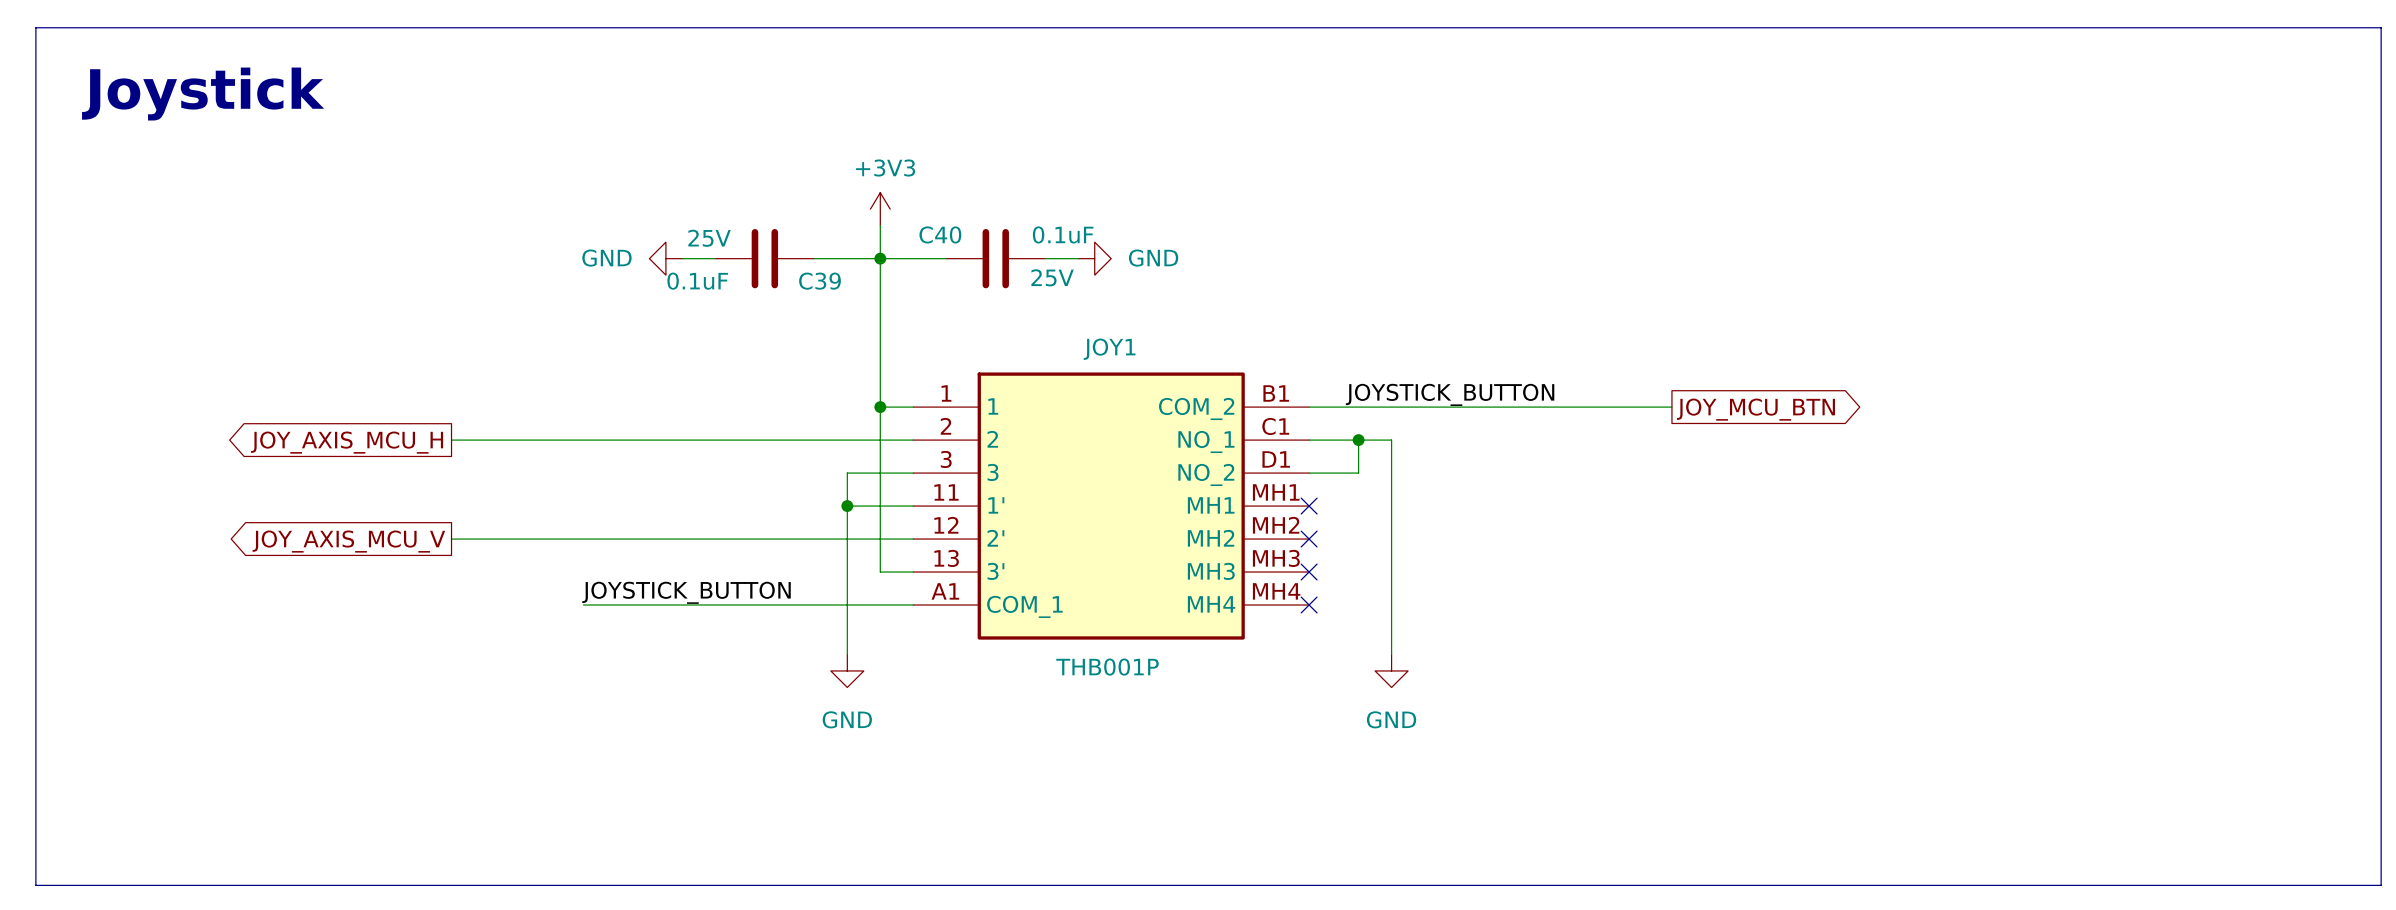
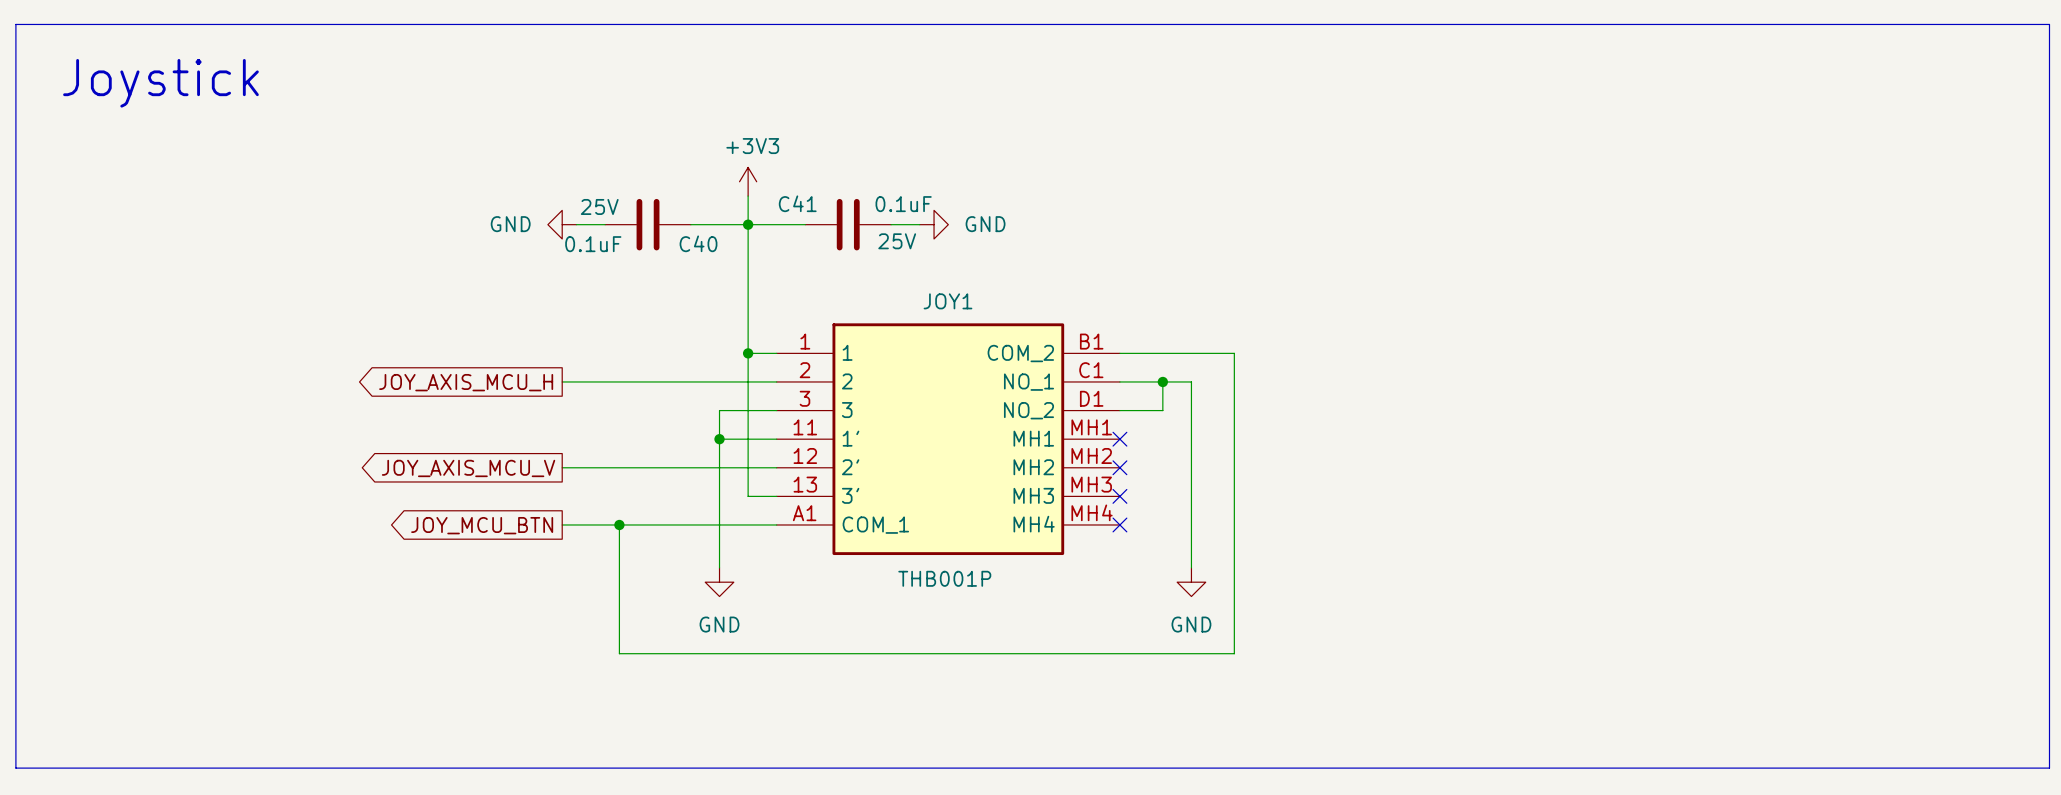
C40 name: C40 (940, 234) -> C41 (797, 203)
C39 name: C39 (819, 281) -> C40 (698, 243)
label: JOYSTICK_BUTTON (1450, 394) -> none
wire: (1441, 407) (1671, 407) -> (1234, 353) (1234, 653) (619, 653) (619, 524)
global label: JOY_MCU_BTN (1755, 409) -> none
wire: (451, 440) (665, 440) -> none
global label position: JOY_AXIS_MCU_H (347, 442) -> JOY_AXIS_MCU_H (466, 382)
wire: (451, 539) (665, 539) -> none
global label position: JOY_AXIS_MCU_V (348, 541) -> JOY_AXIS_MCU_V (468, 468)
label: JOYSTICK_BUTTON (686, 592) -> none
wire: (583, 605) (665, 605) -> none
junction: none -> (619, 524)
global label: none -> JOY_MCU_BTN (482, 525)

